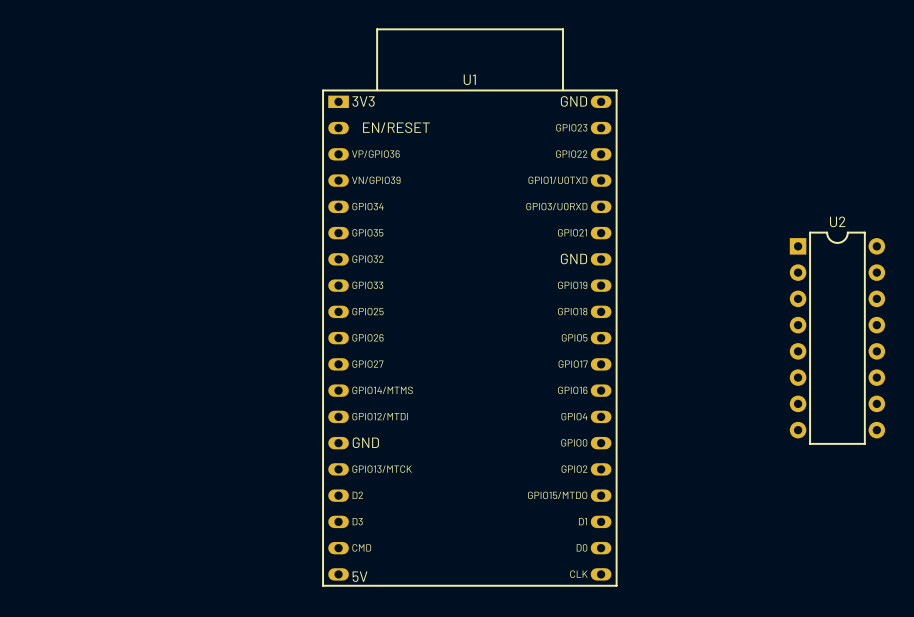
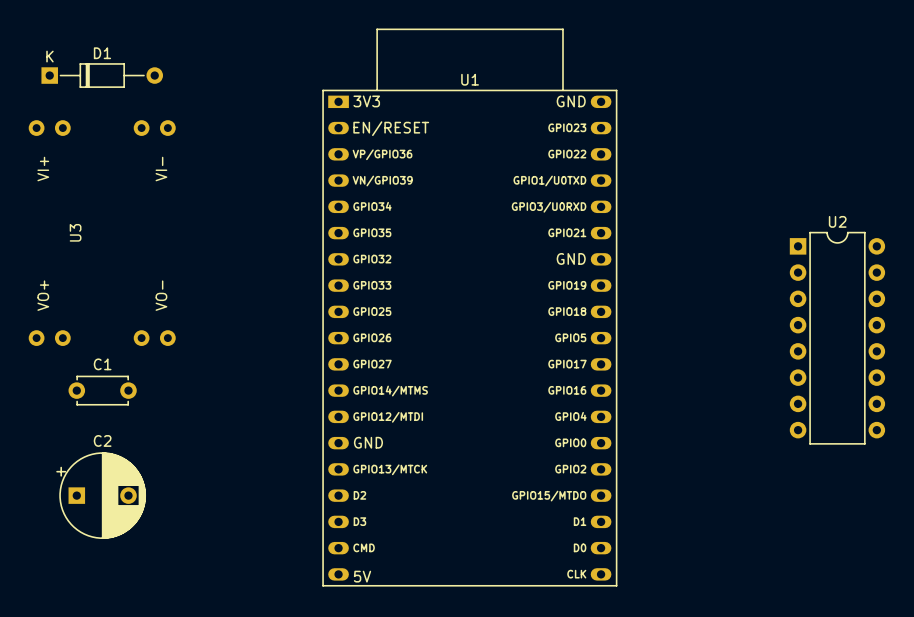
D1: none -> (102, 75)
U3: none -> (102, 233)
C1: none -> (102, 390)
C2: none -> (101, 495)

